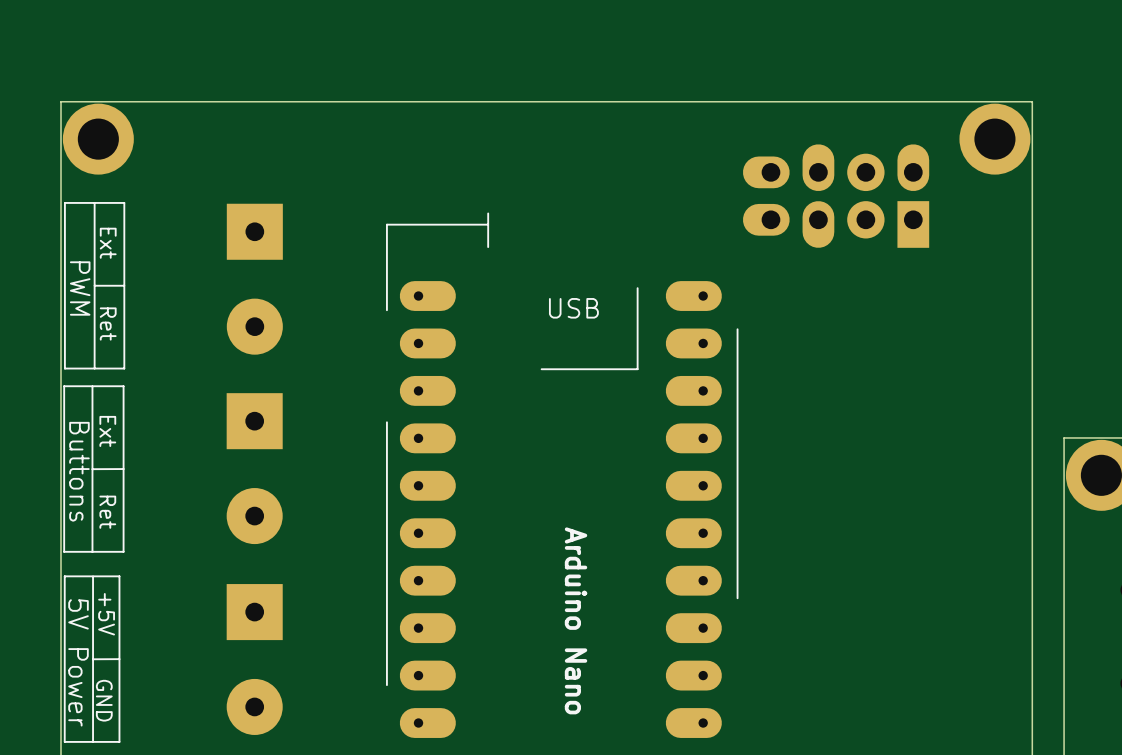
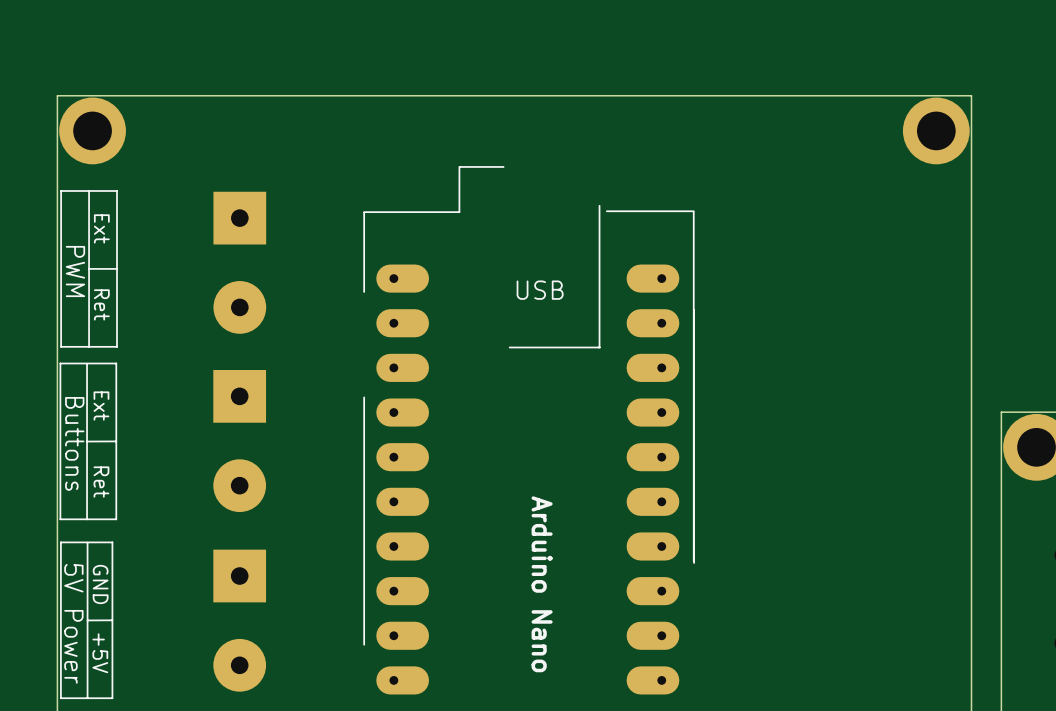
line: none -> (503, 166) (459, 166)
part: (836, 196) -> none
line: (488, 213) (488, 247) -> none
line: (488, 224) (386, 226) -> (459, 166) (459, 212) (364, 212)
line: none -> (693, 211) (606, 211)
line: none -> (693, 212) (693, 561)
line: (637, 288) (637, 369) -> (599, 205) (599, 347)
text: +5V (106, 614) -> GND (100, 584)
text: none -> +5V (100, 653)
text: GND (104, 700) -> none

